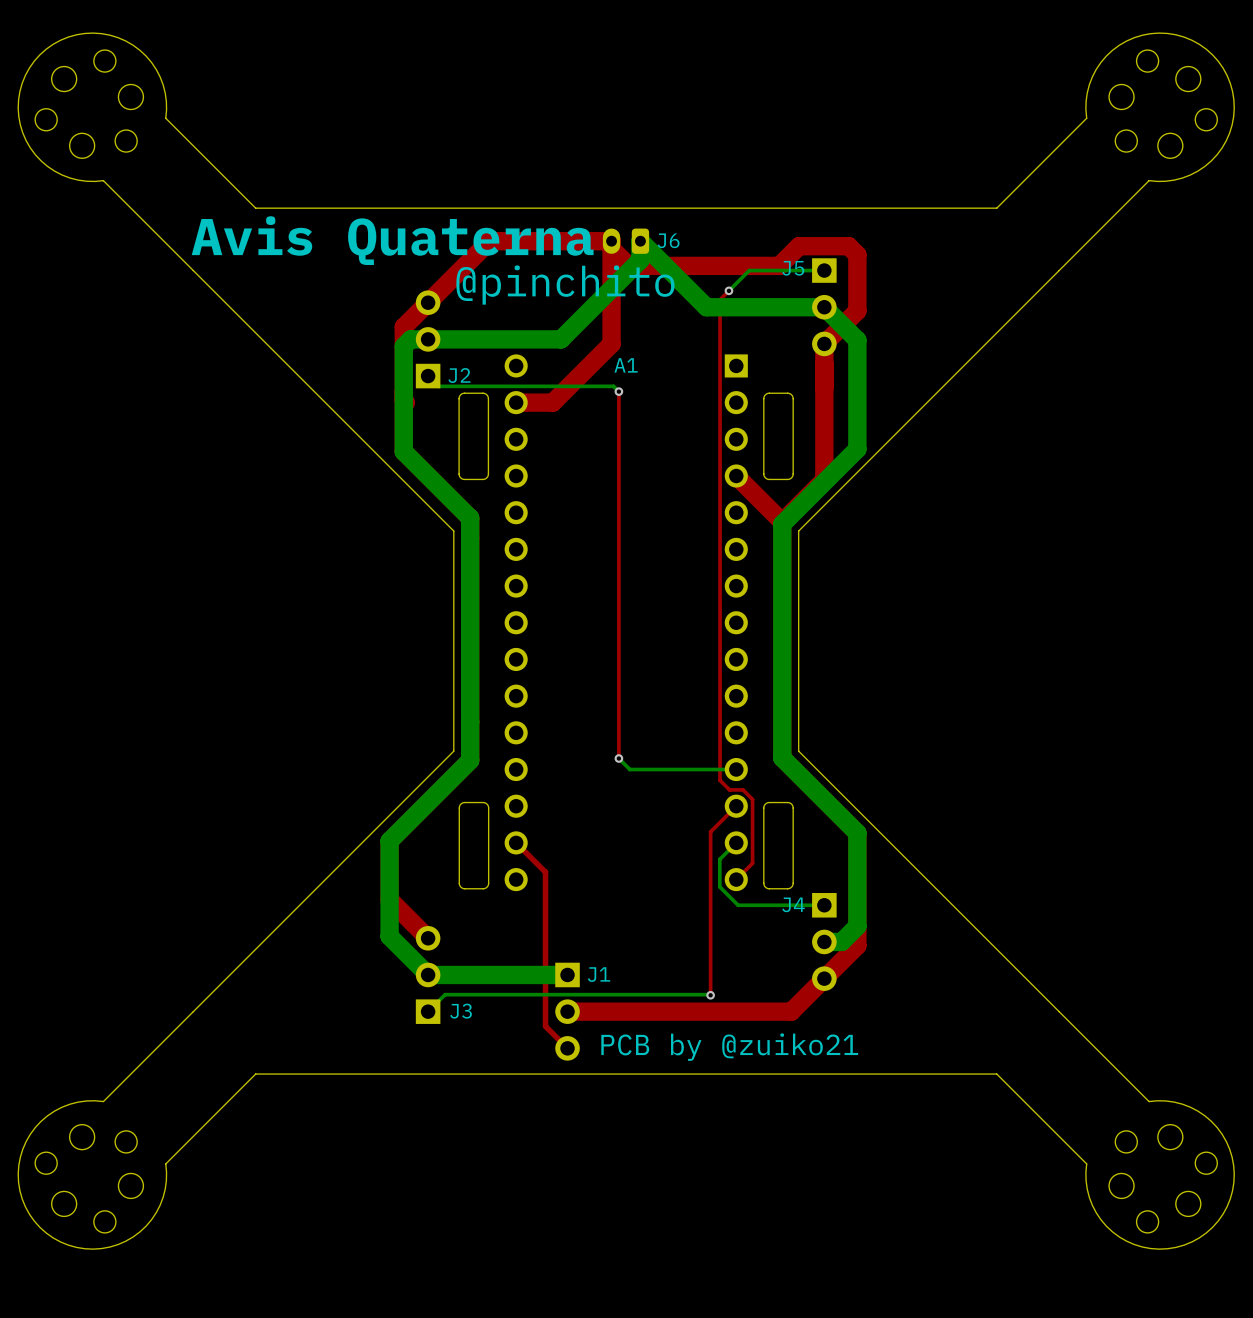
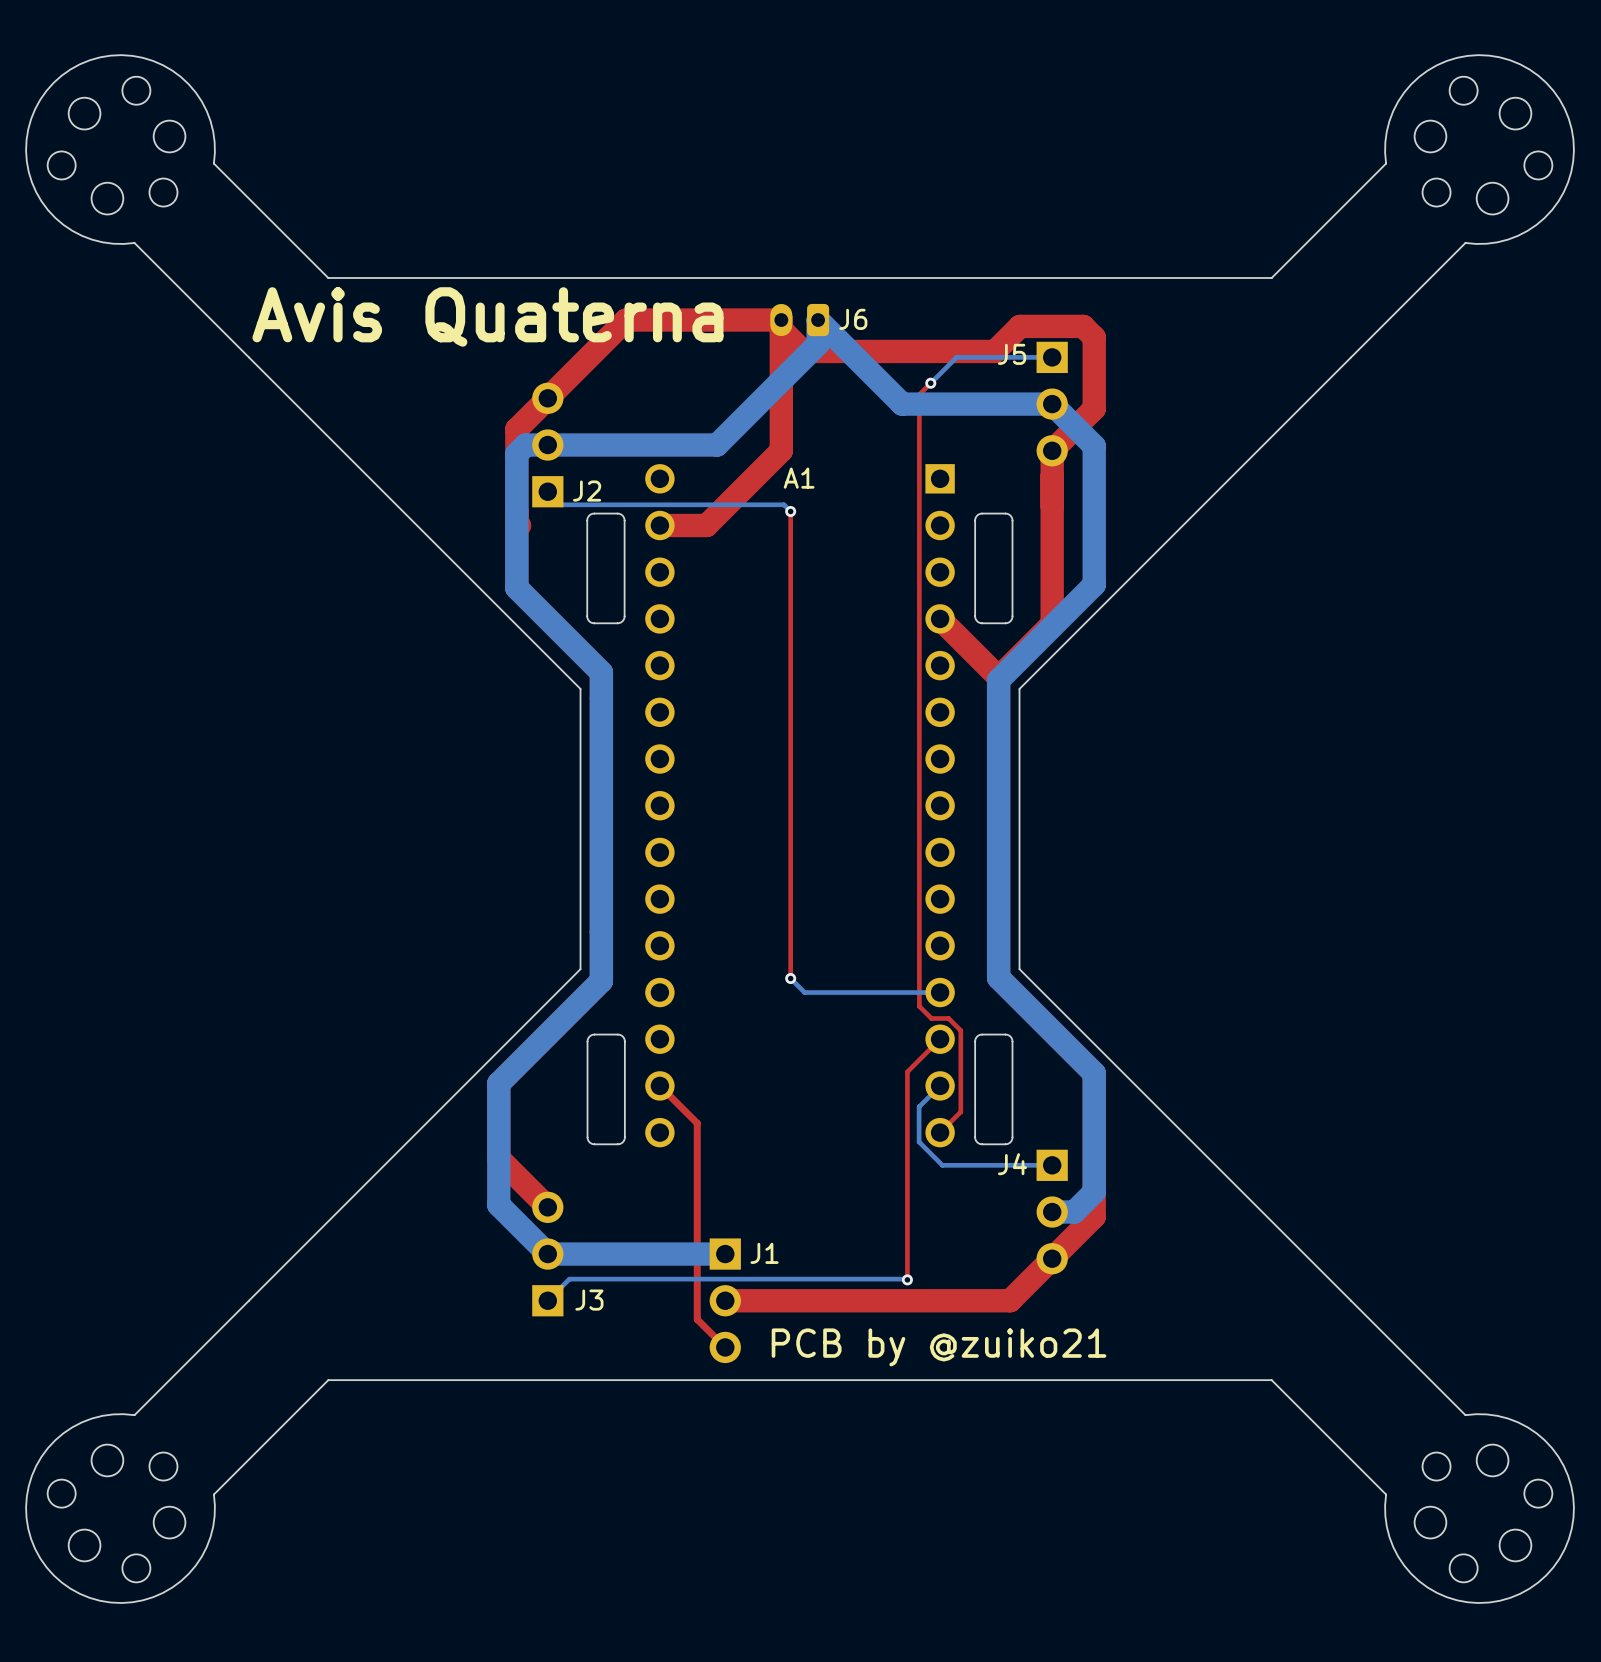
text: @pinchito (565, 285) -> none

